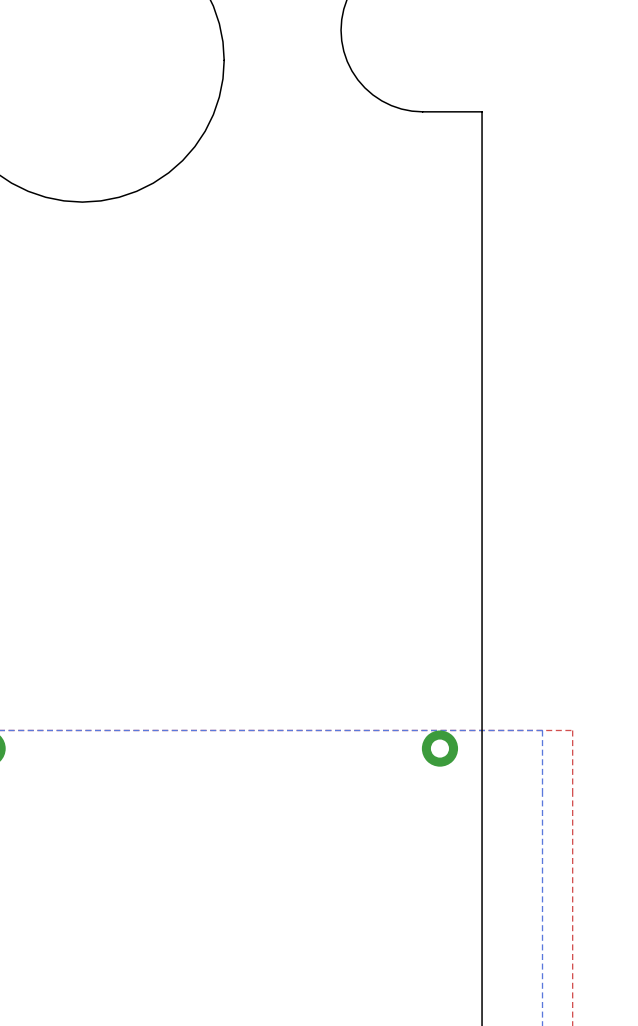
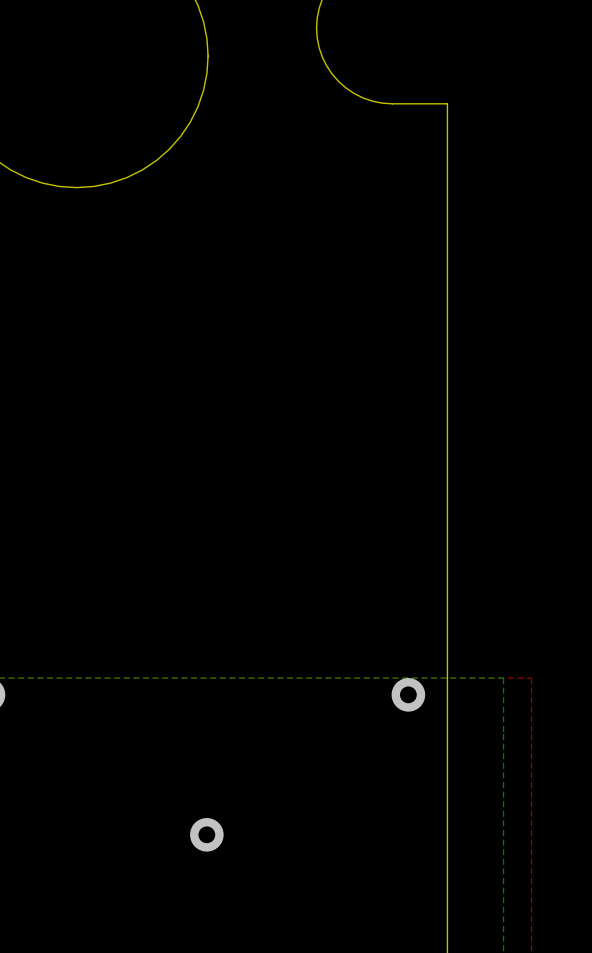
via: none -> (206, 834)

